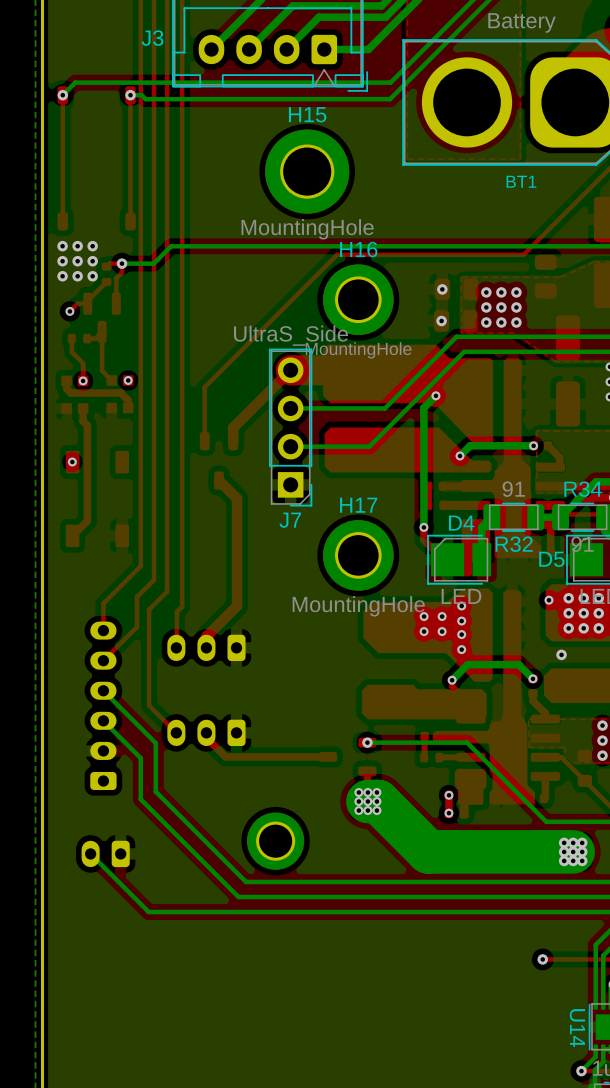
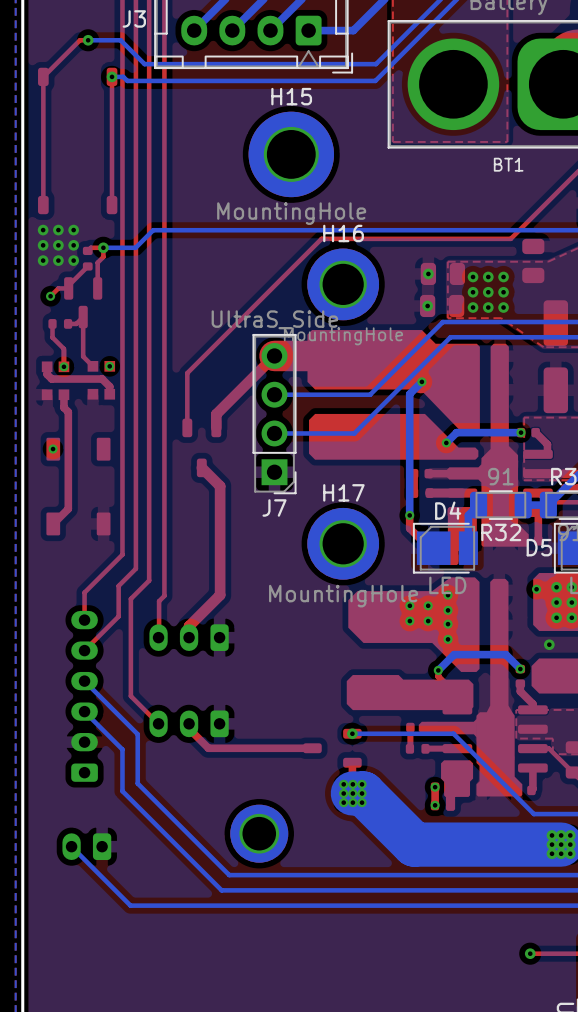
top track: none -> (88, 40) (79, 40) (43, 76)
bottom track: (162, 82) (75, 82) (62, 95) -> (144, 64) (120, 40) (88, 40)
via position: (62, 95) -> (88, 40)

